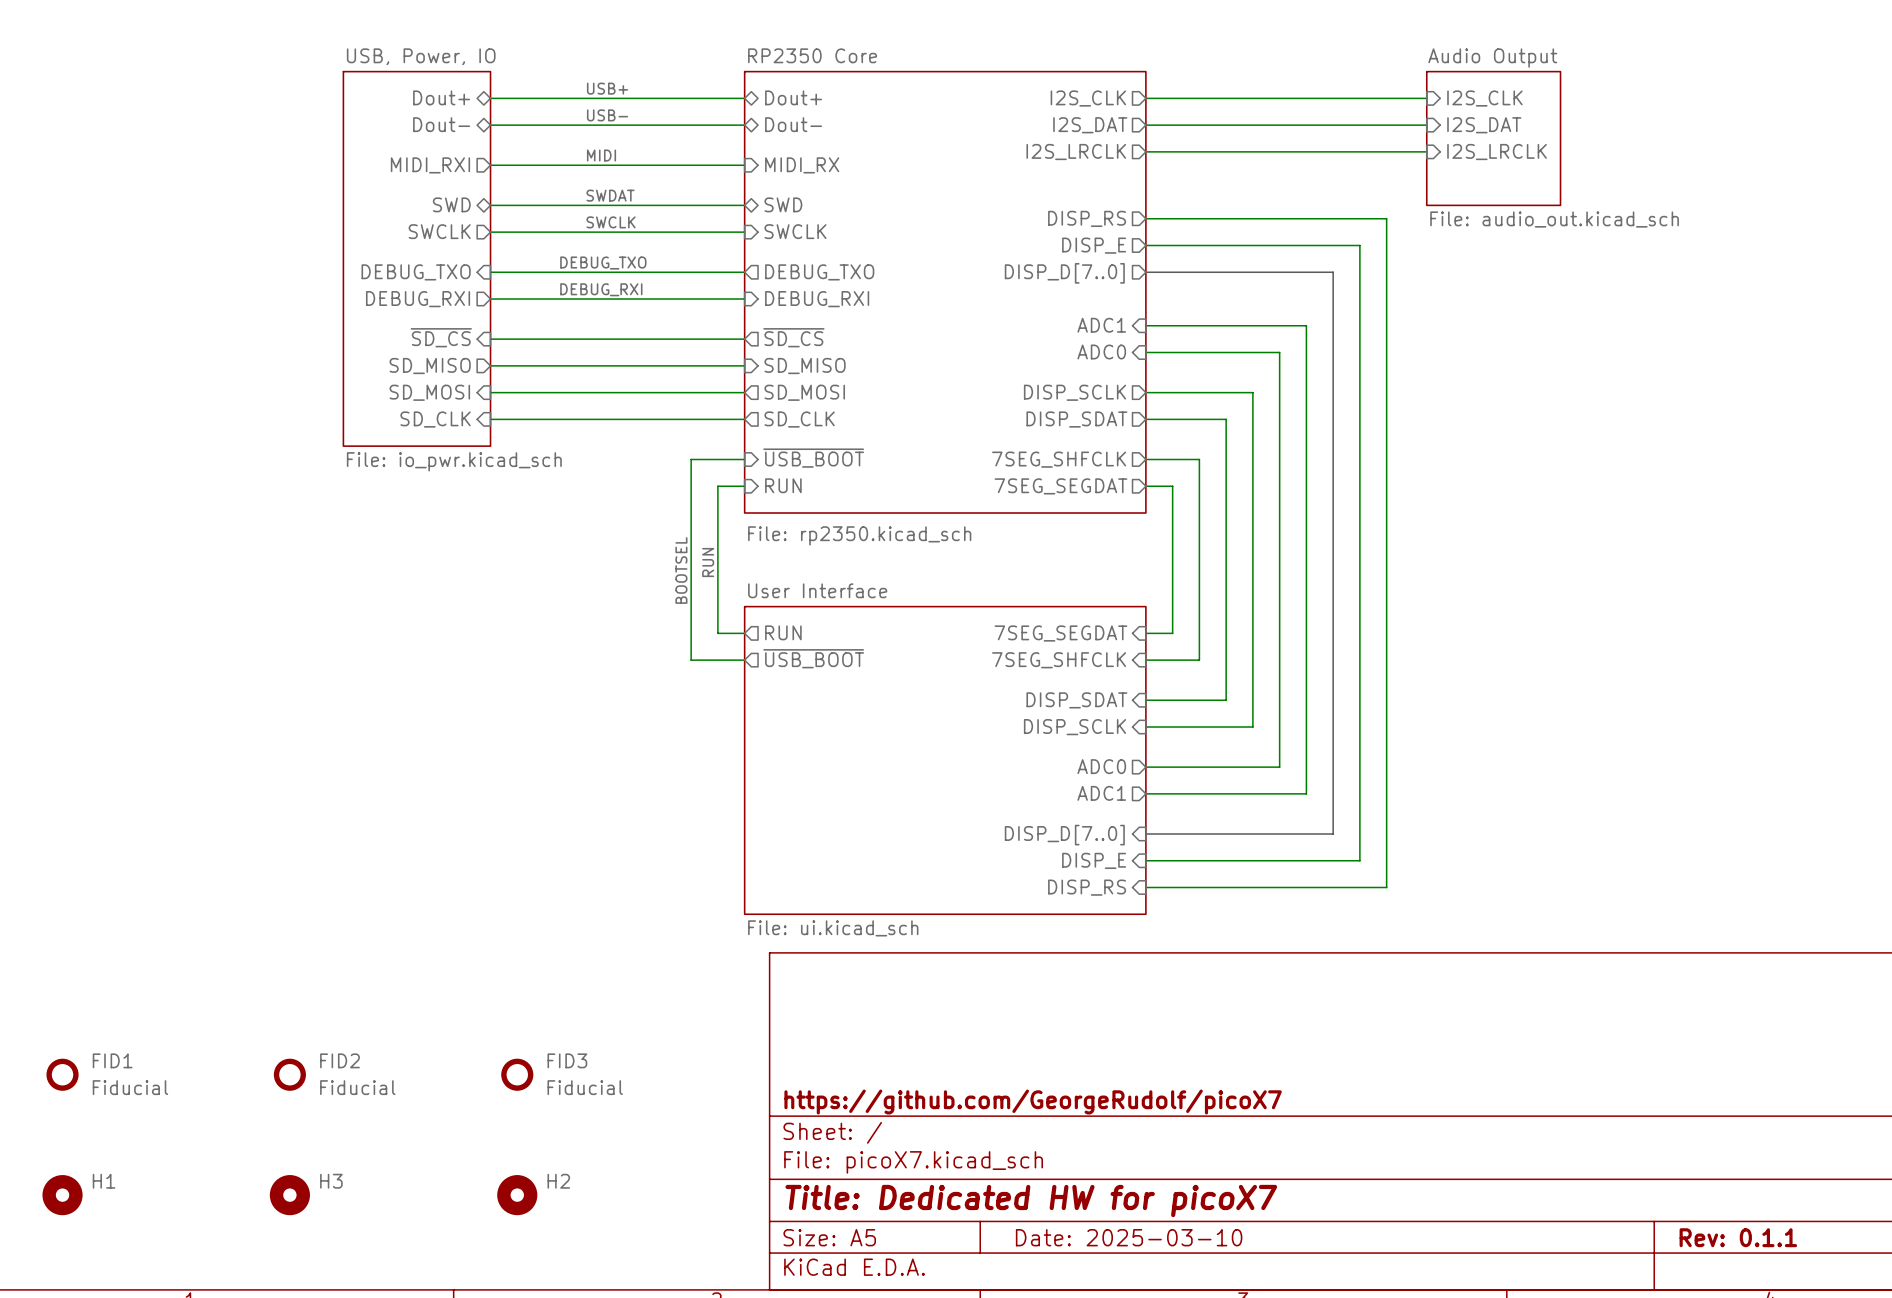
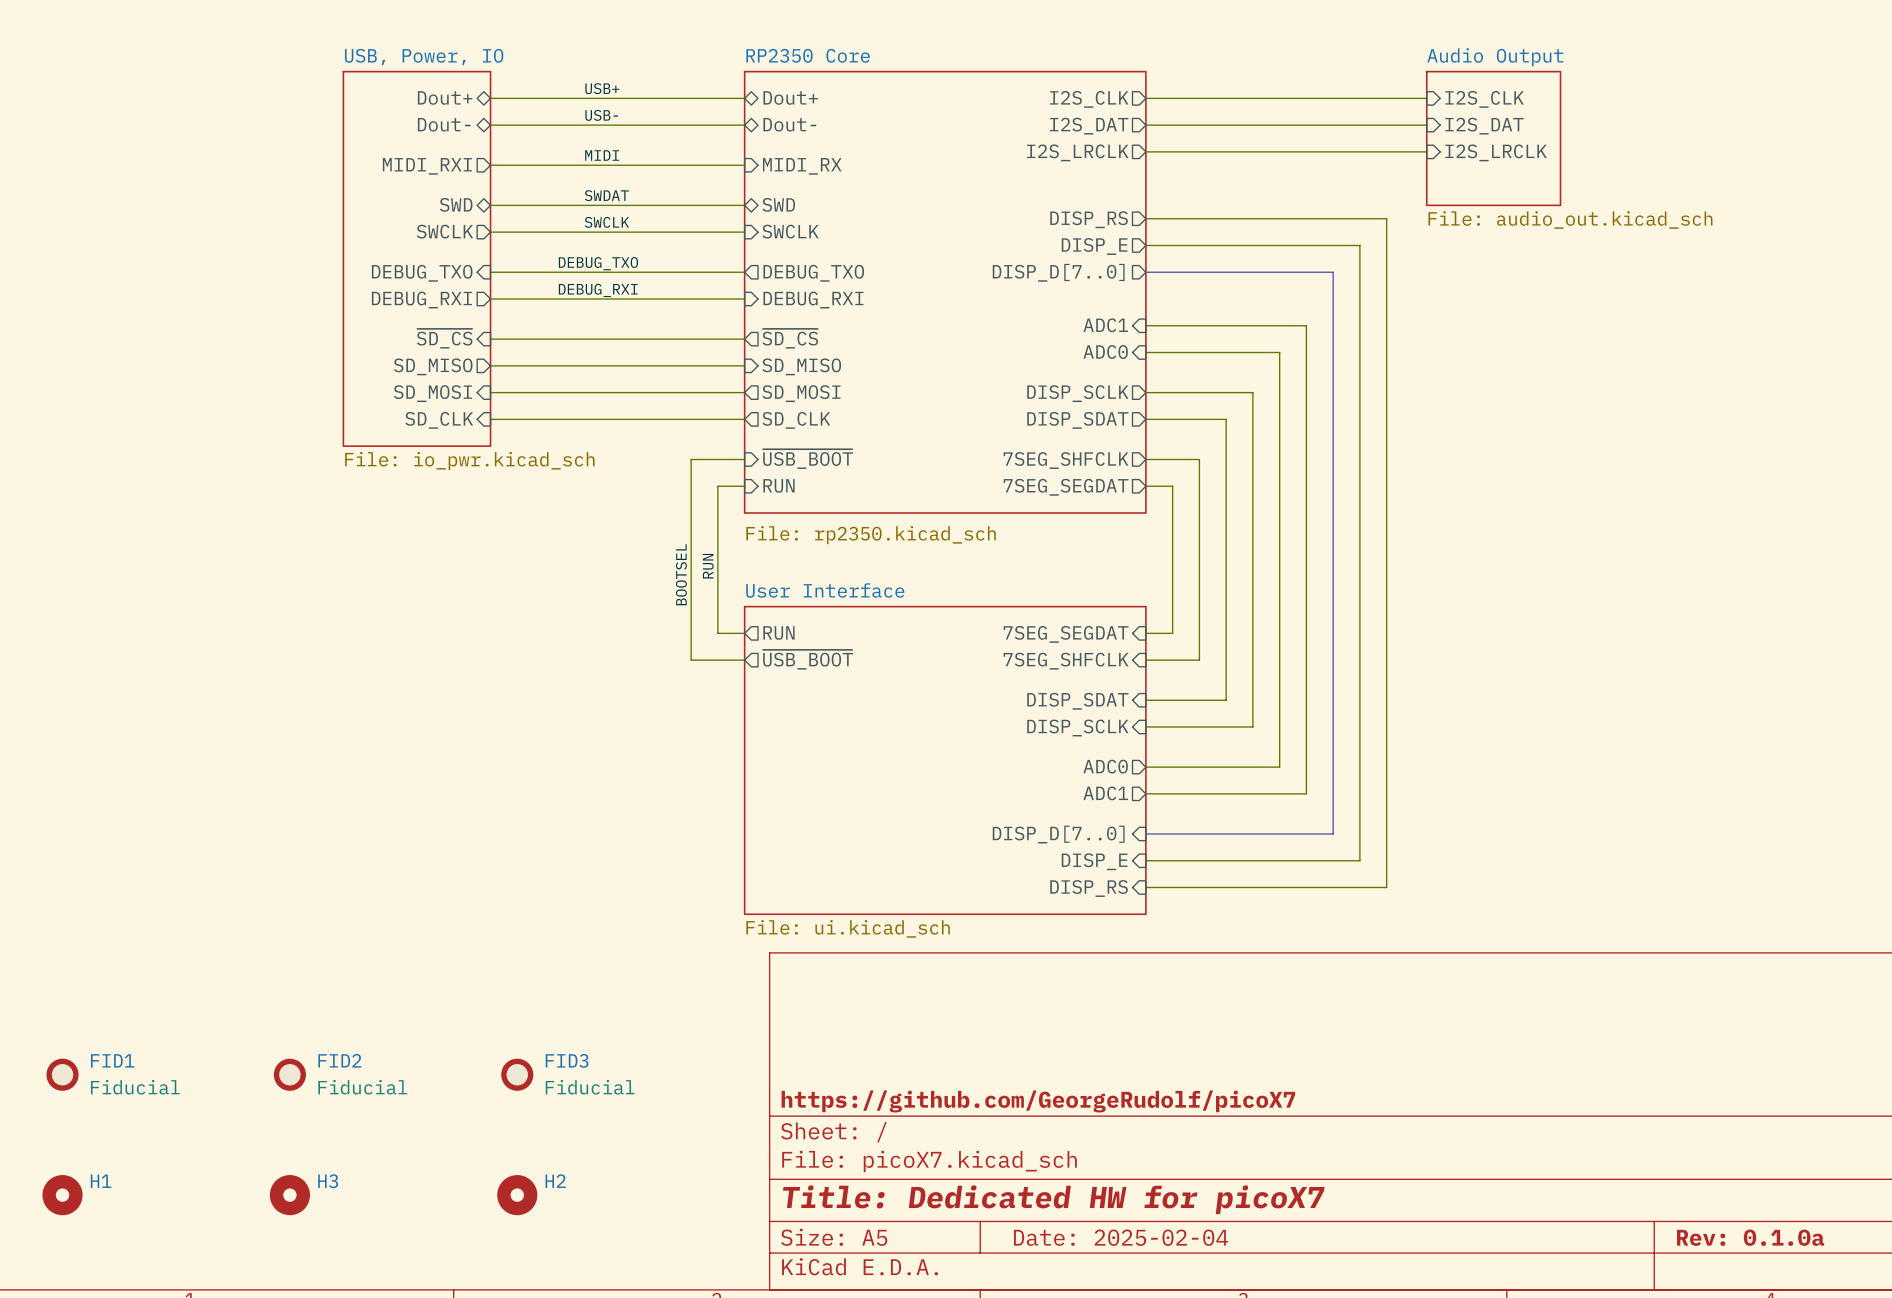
title block: Date: 2025-03-10 (1129, 1237) -> Date: 2025-02-04 (1121, 1237)
title block: Rev: 0.1.1 (1738, 1237) -> Rev: 0.1.0a (1750, 1237)

